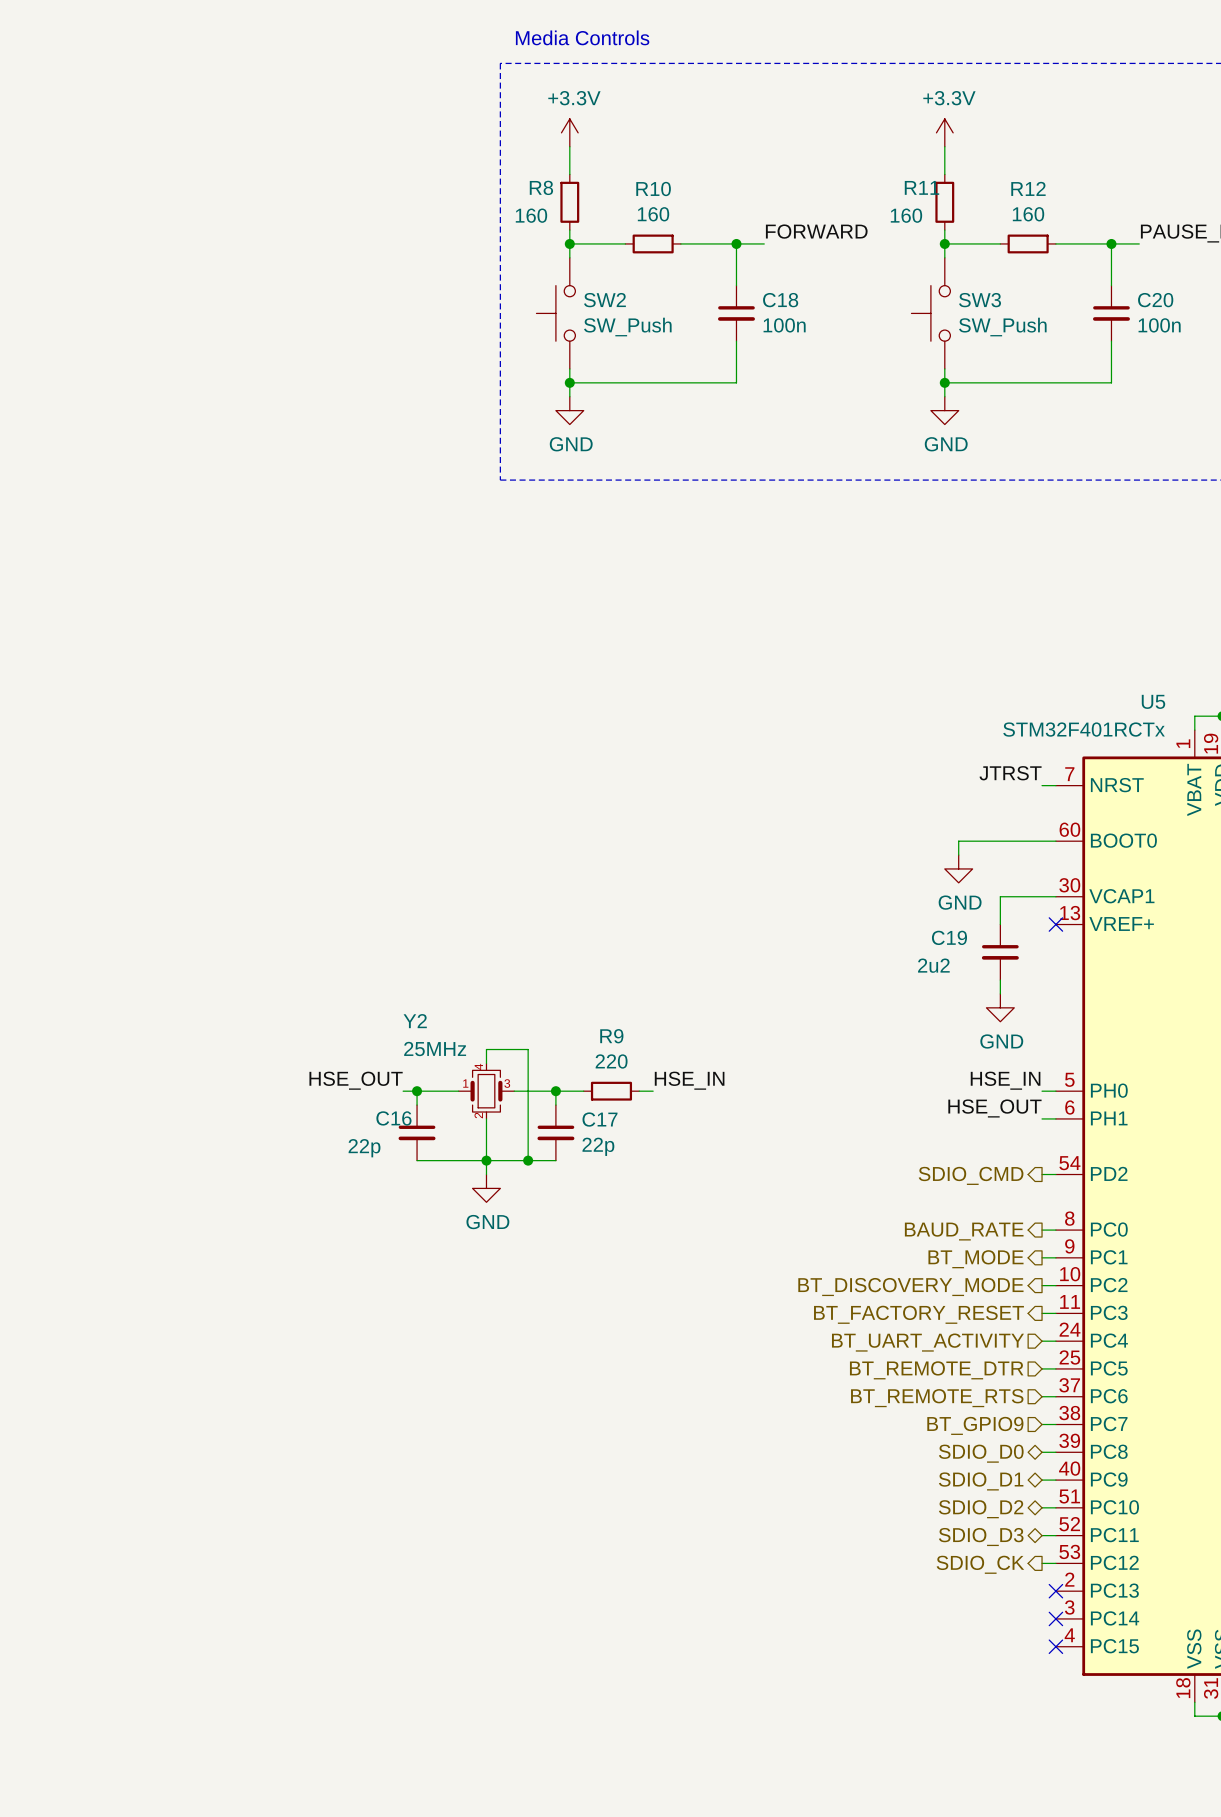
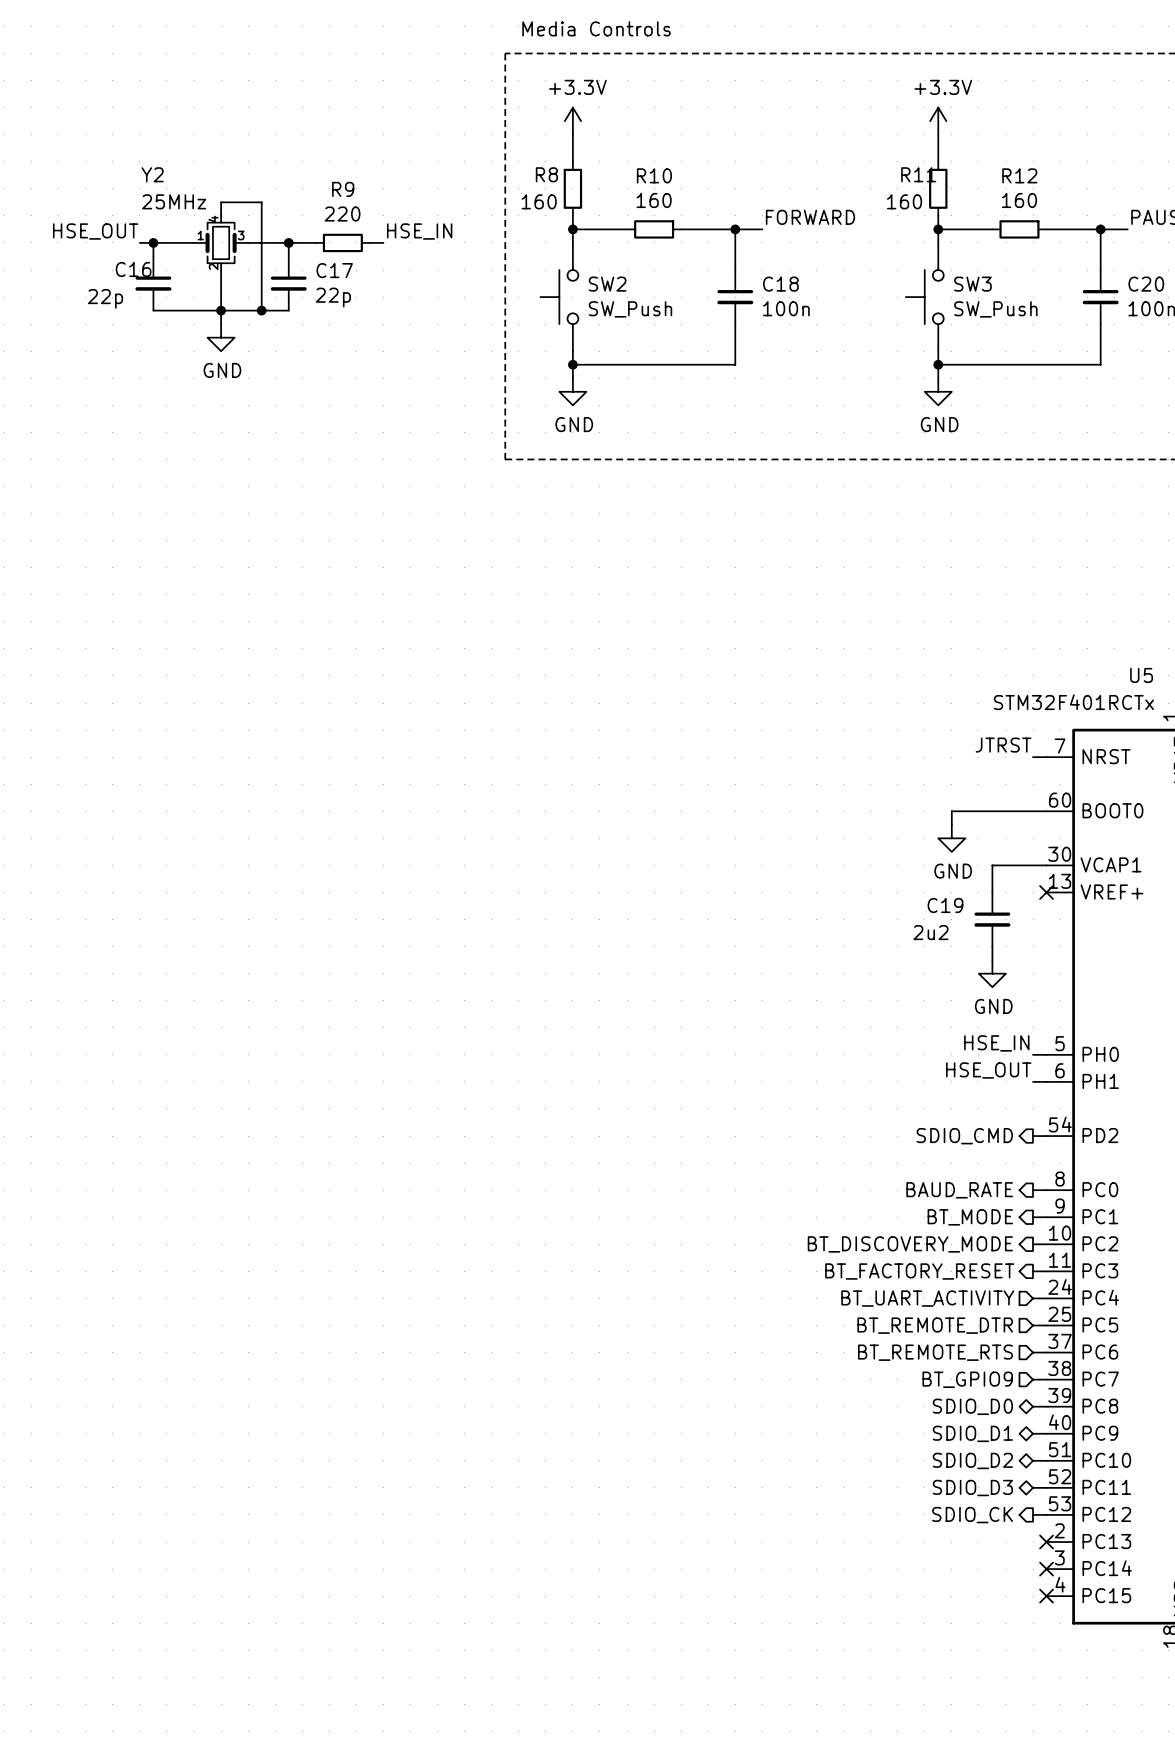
wire: none -> (221, 215) (221, 202) (261, 202) (261, 310)
label: none -> HSE_OUT (95, 231)
label: none -> HSE_IN (419, 231)
wire: none -> (139, 242) (194, 242)
wire: none -> (153, 242) (153, 256)
junction: none -> (153, 242)
wire: none -> (248, 242) (315, 242)
wire: none -> (288, 242) (288, 256)
junction: none -> (288, 242)
wire: none -> (369, 242) (383, 242)
wire: none -> (221, 270) (221, 324)
wire: none -> (153, 310) (288, 310)
junction: none -> (221, 310)
junction: none -> (261, 310)
power symbol: none -> GND (221, 337)
wire: (486, 1063) (486, 1049) (528, 1049) (528, 1160) -> none
label: HSE_OUT (356, 1080) -> none
label: HSE_IN (689, 1080) -> none
wire: (403, 1091) (458, 1091) -> none
wire: (417, 1091) (417, 1105) -> none
junction: (417, 1091) -> none
Y2 position: (486, 1091) -> (221, 242)
wire: (514, 1091) (583, 1091) -> none
wire: (555, 1091) (555, 1105) -> none
junction: (555, 1091) -> none
R9 position: (611, 1091) -> (342, 242)
wire: (639, 1091) (653, 1091) -> none
wire: (486, 1118) (486, 1174) -> none
C16 position: (417, 1132) -> (153, 283)
C17 position: (555, 1132) -> (288, 283)
wire: (417, 1160) (555, 1160) -> none
junction: (486, 1160) -> none
junction: (528, 1160) -> none
power symbol: GND (486, 1188) -> none

